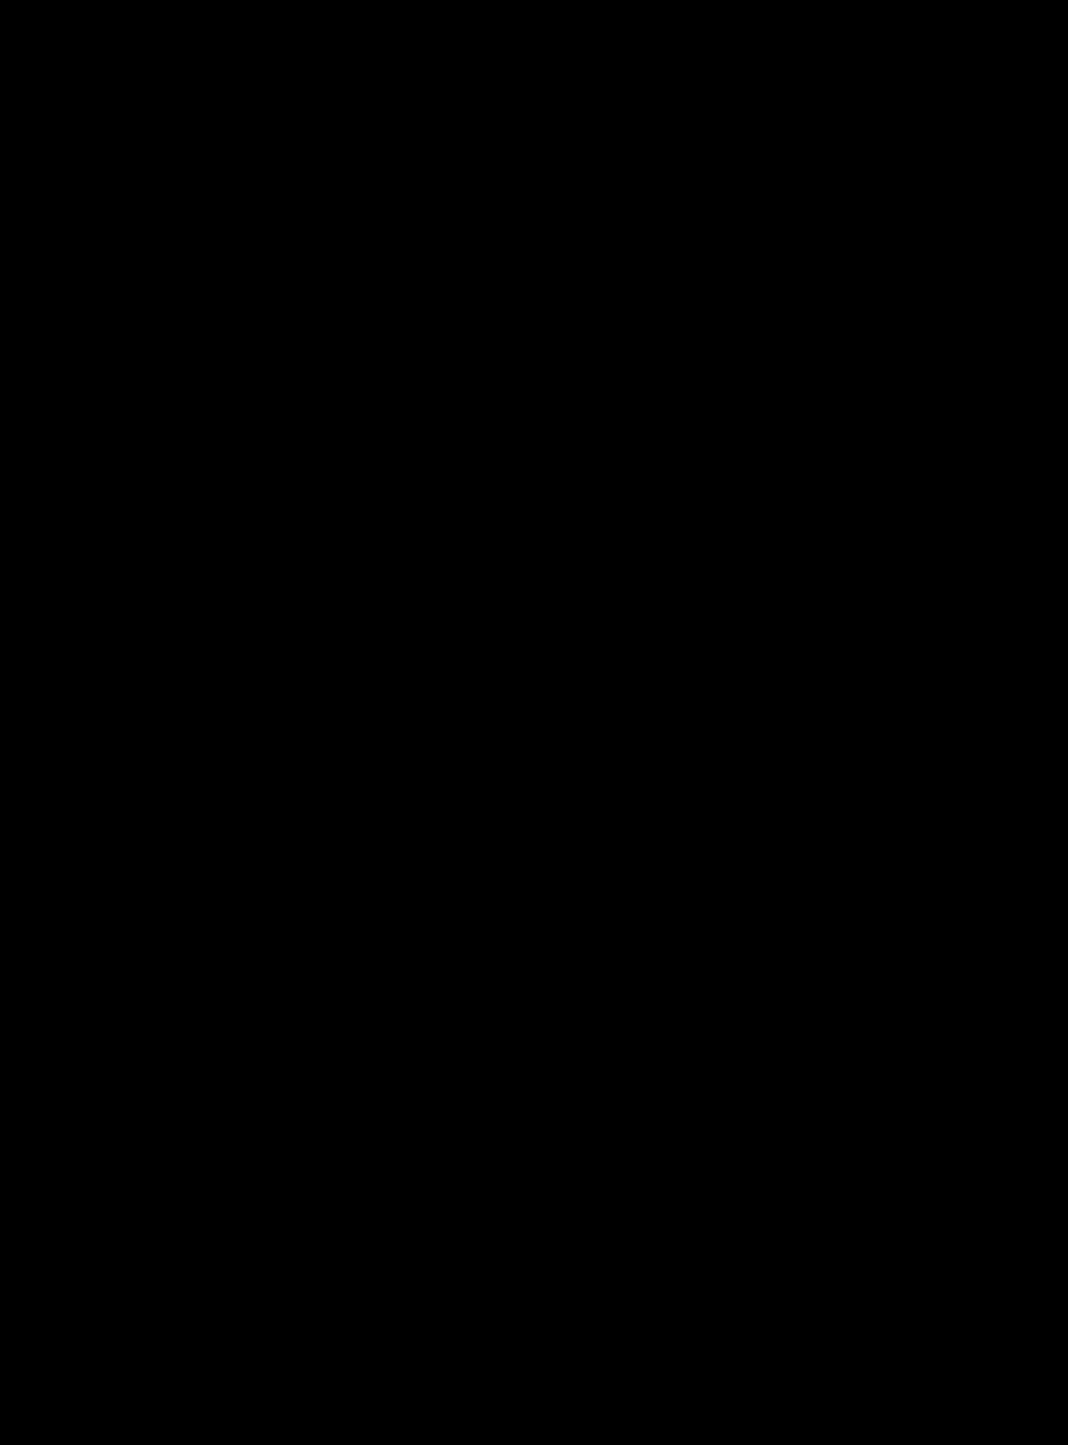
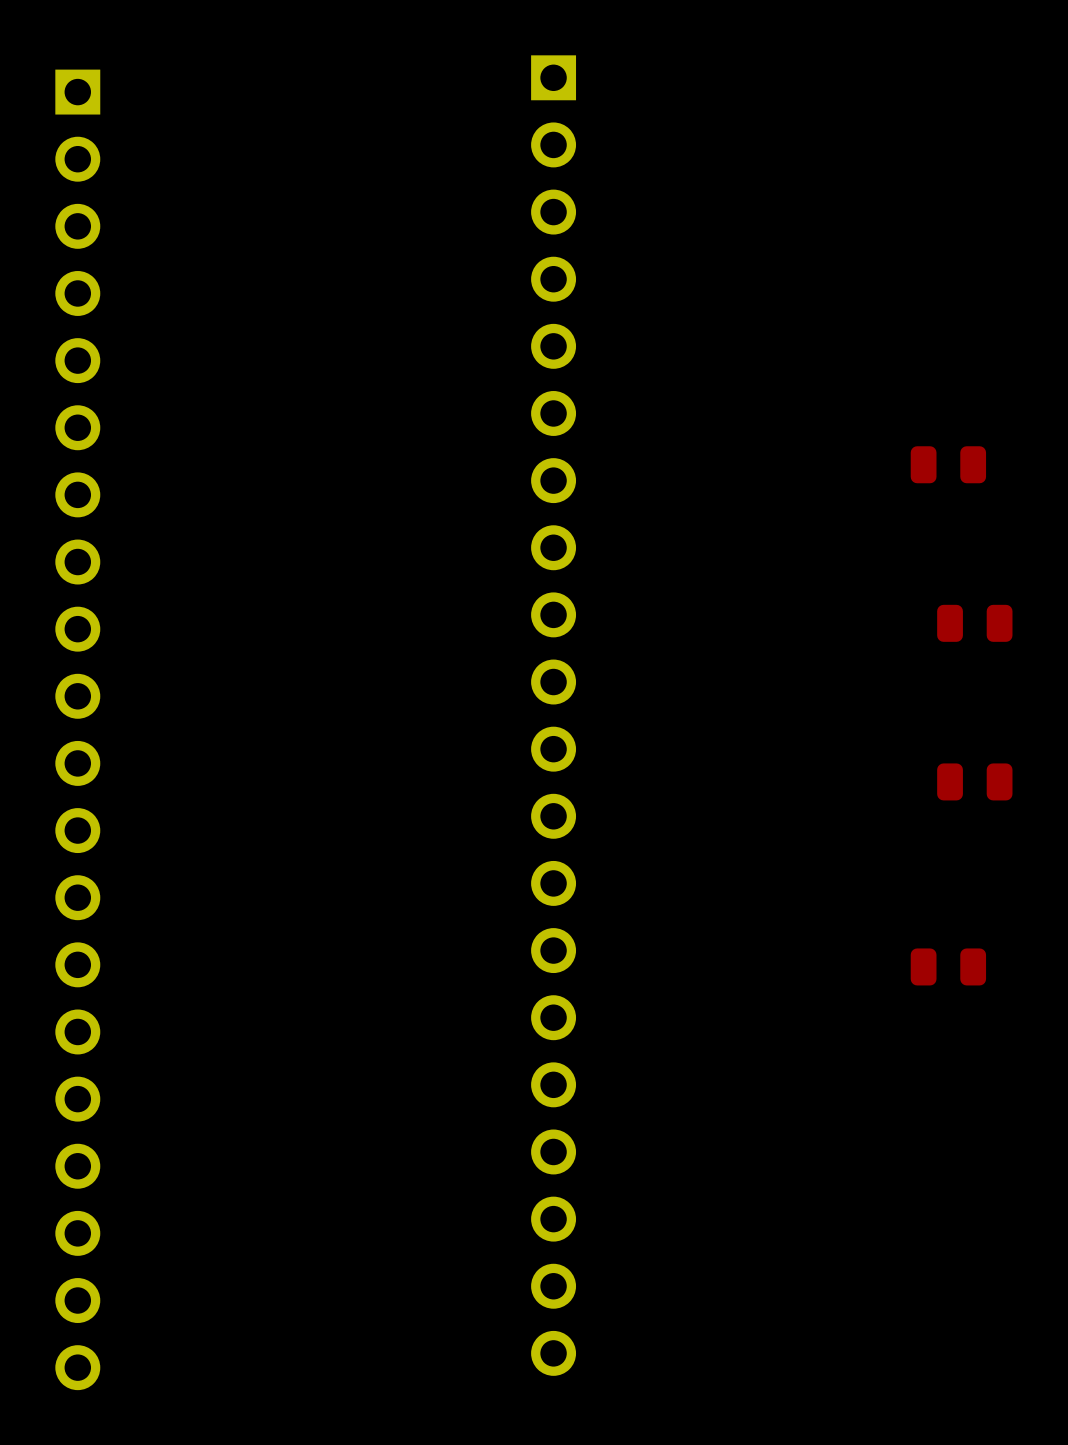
part: none -> (948, 464)
part: none -> (974, 623)
part: none -> (553, 715)
part: none -> (77, 729)
part: none -> (974, 781)
part: none -> (948, 966)

